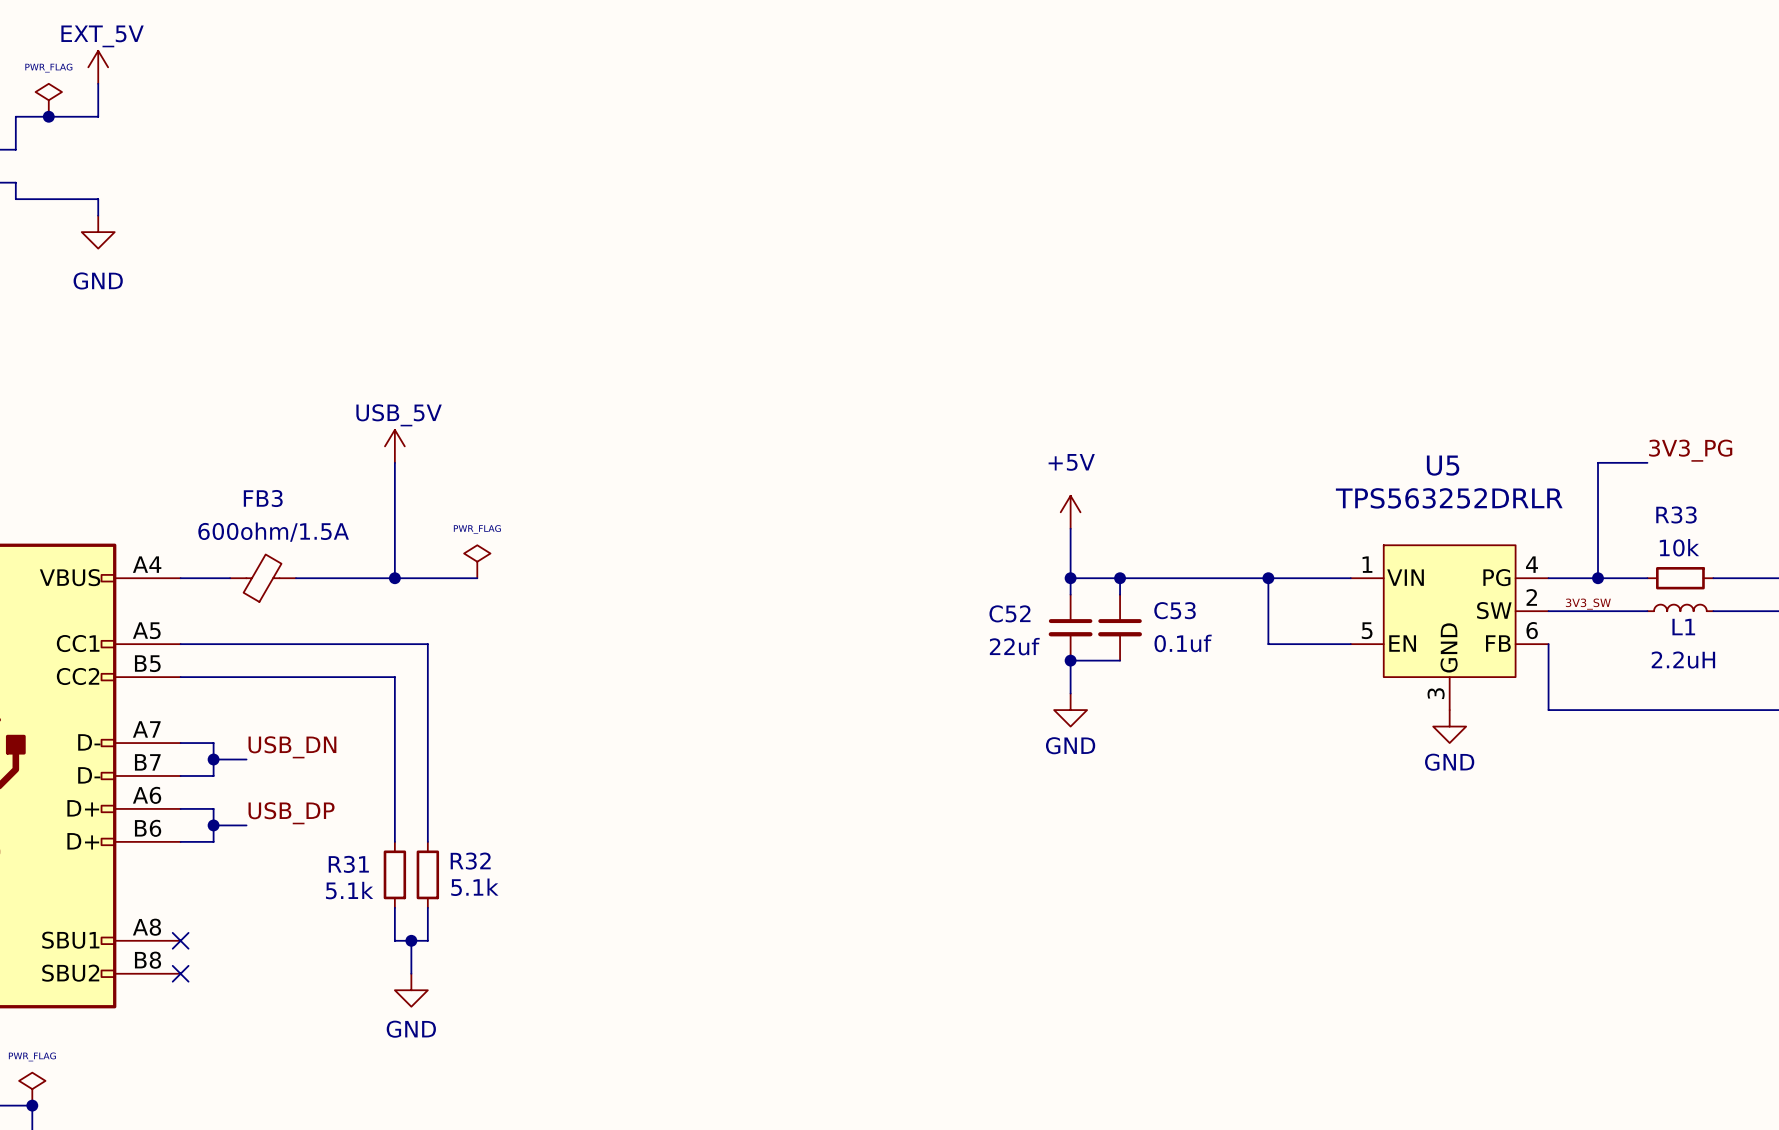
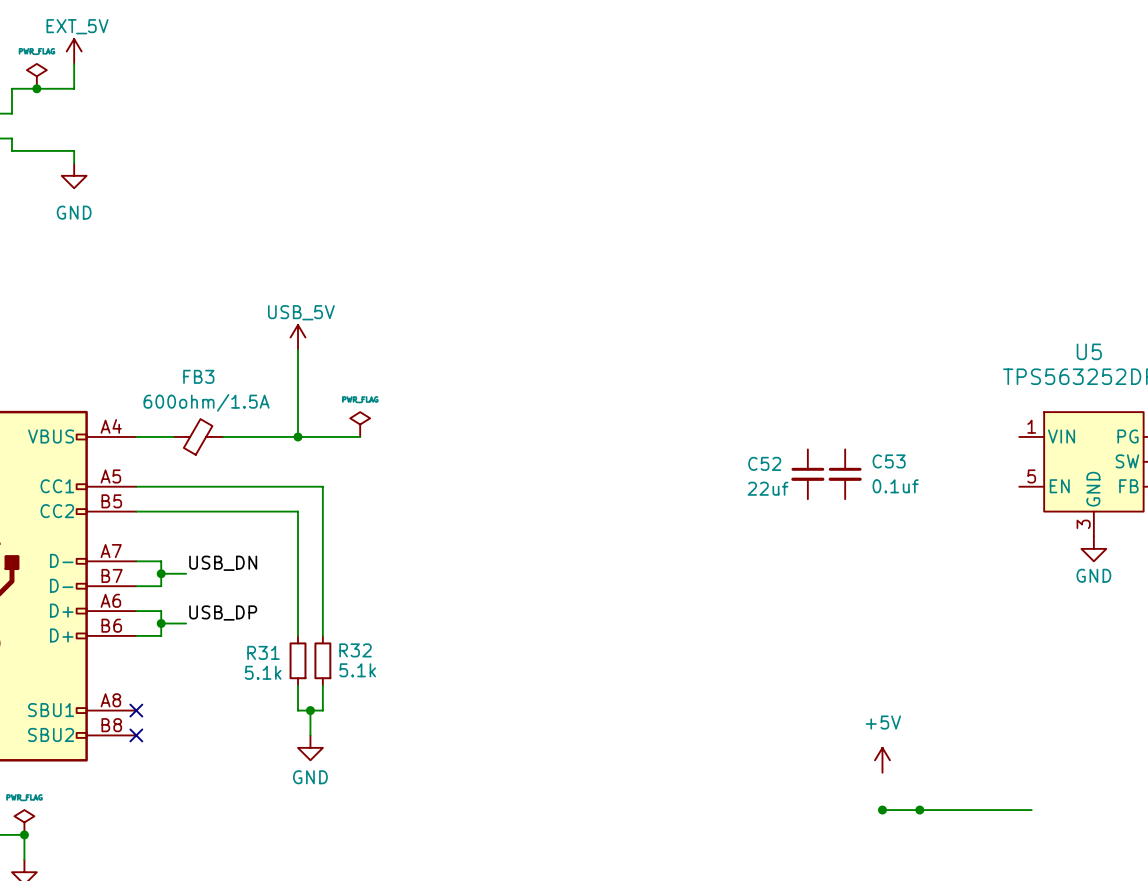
power symbol: +5V (1070, 512) -> none
wire: (1070, 528) (1070, 594) -> none
wire: (1070, 578) (1350, 578) -> none
junction: (1070, 578) -> none
wire: (1120, 578) (1120, 594) -> none
junction: (1120, 578) -> none
wire: (1268, 578) (1268, 644) (1350, 644) -> none
junction: (1268, 578) -> none
junction: (1070, 660) -> none
wire: (1120, 660) (1070, 660) (1070, 693) -> none
power symbol: GND (1070, 710) -> none
power symbol: none -> +5V (882, 760)
wire: none -> (882, 810) (1031, 810)
junction: none -> (882, 810)
junction: none -> (919, 810)

